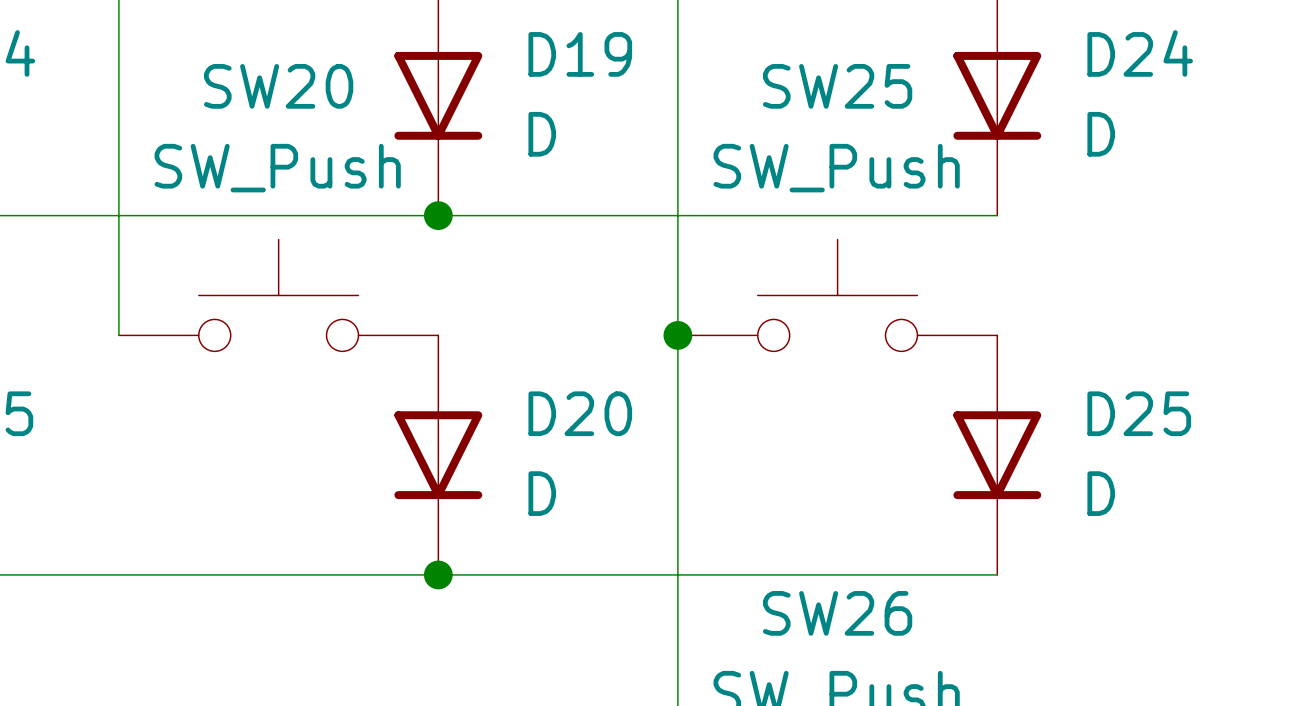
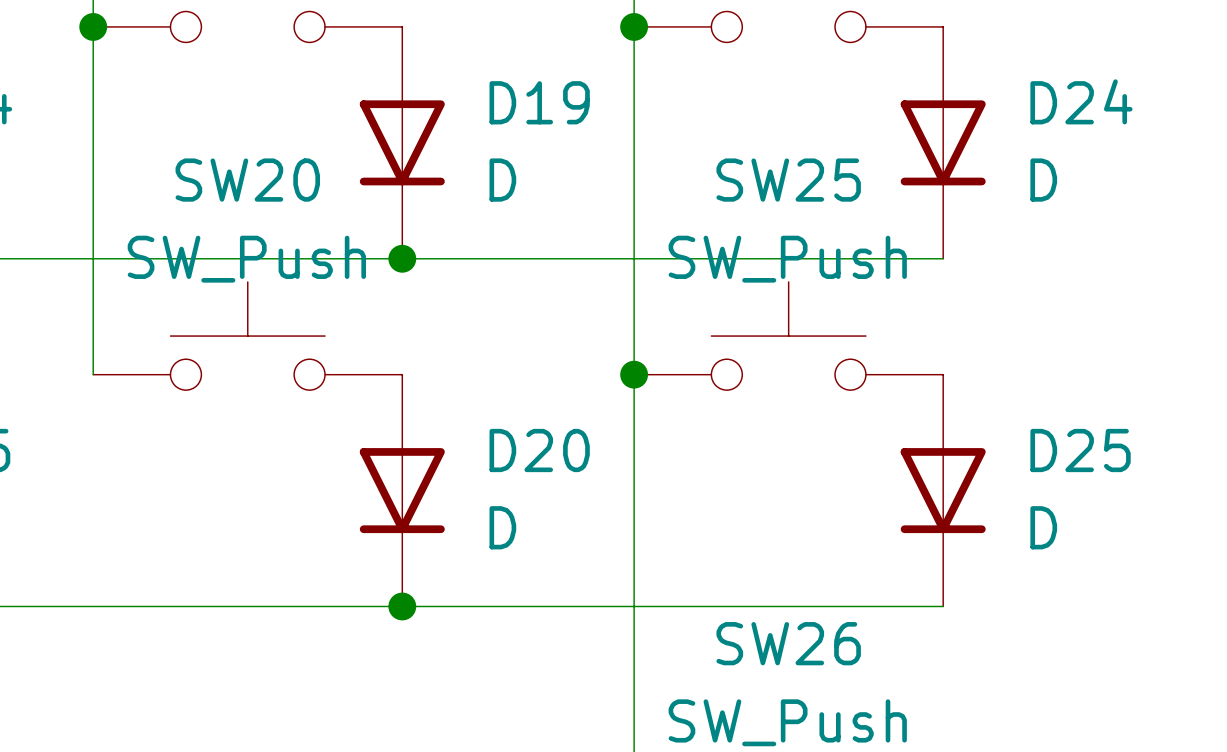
SW20 name position: SW20 (278, 86) -> SW20 (247, 180)
SW25 name position: SW25 (837, 86) -> SW25 (788, 180)
SW20 value position: SW_Push (277, 168) -> SW_Push (246, 259)
SW25 value position: SW_Push (836, 168) -> SW_Push (787, 259)

